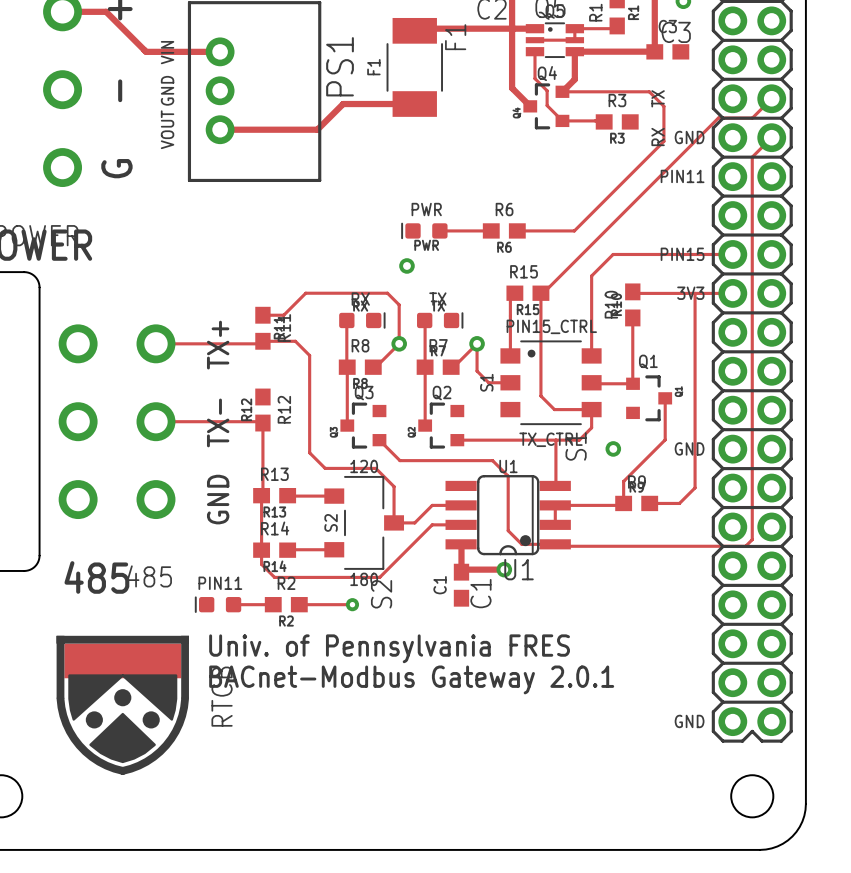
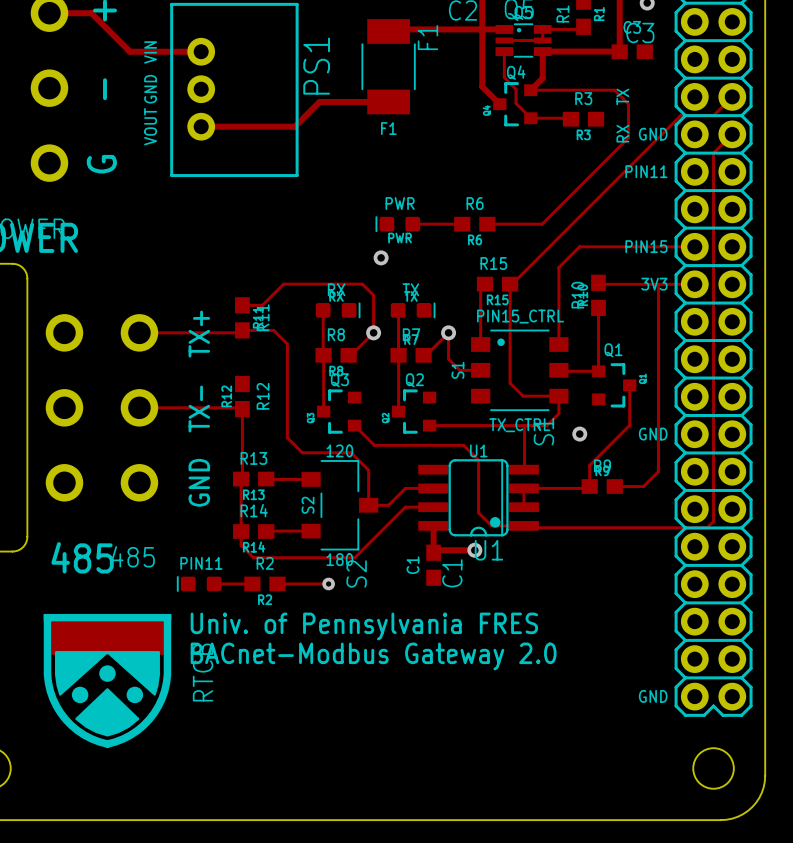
text rotation: 0° (373, 67) -> 90° clockwise (388, 128)
text position: F1 (373, 67) -> F1 (388, 128)
text: BACnet-Modbus Gateway 2.0.1 (411, 679) -> BACnet-Modbus Gateway 2.0 (373, 656)

